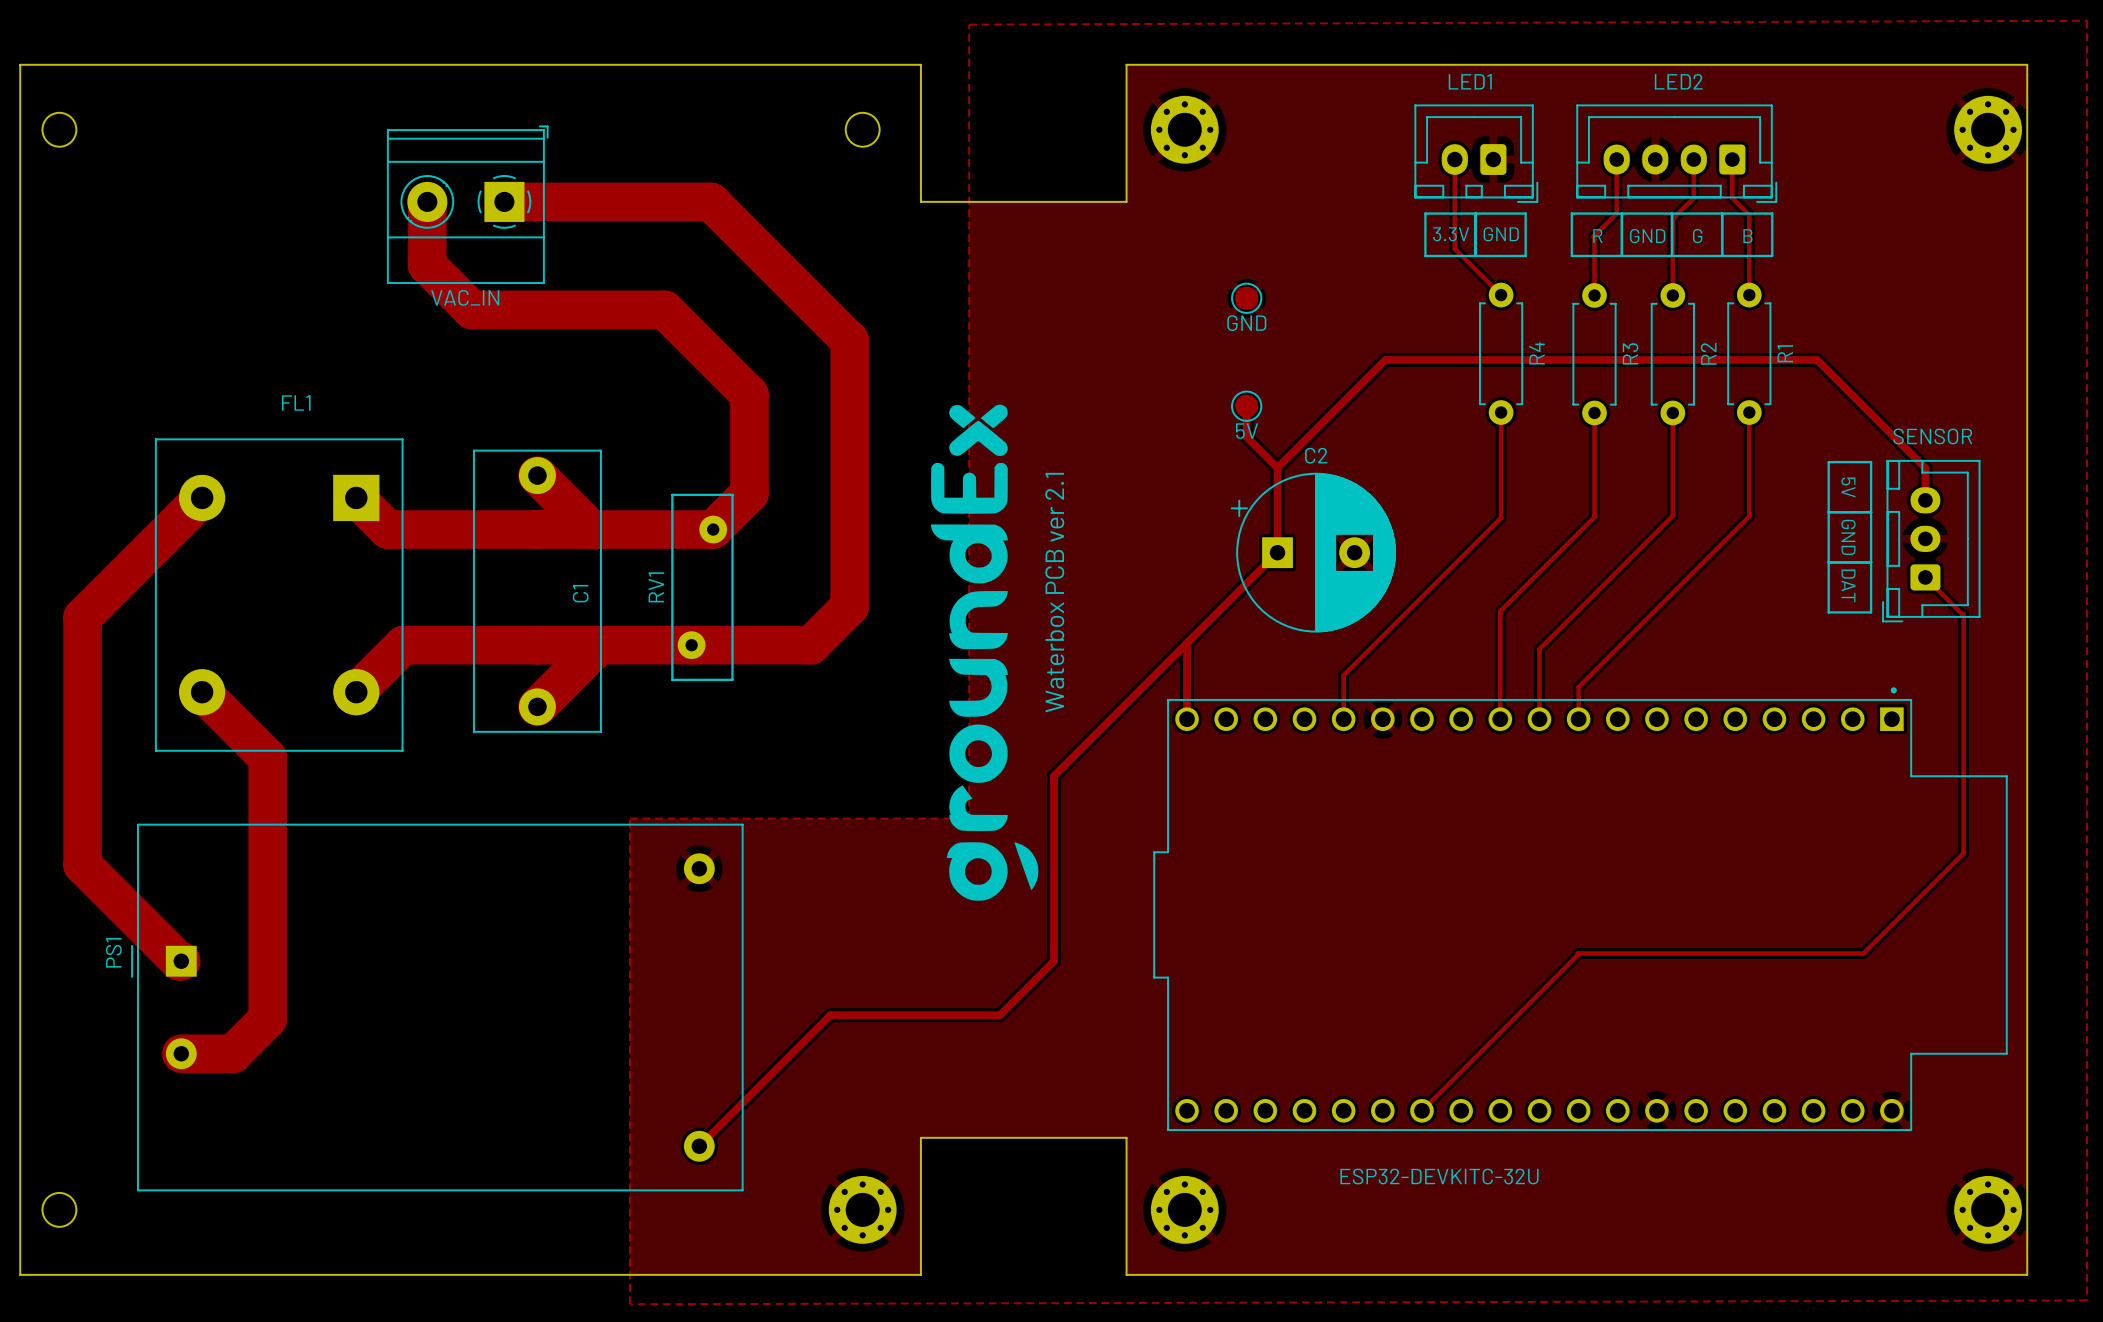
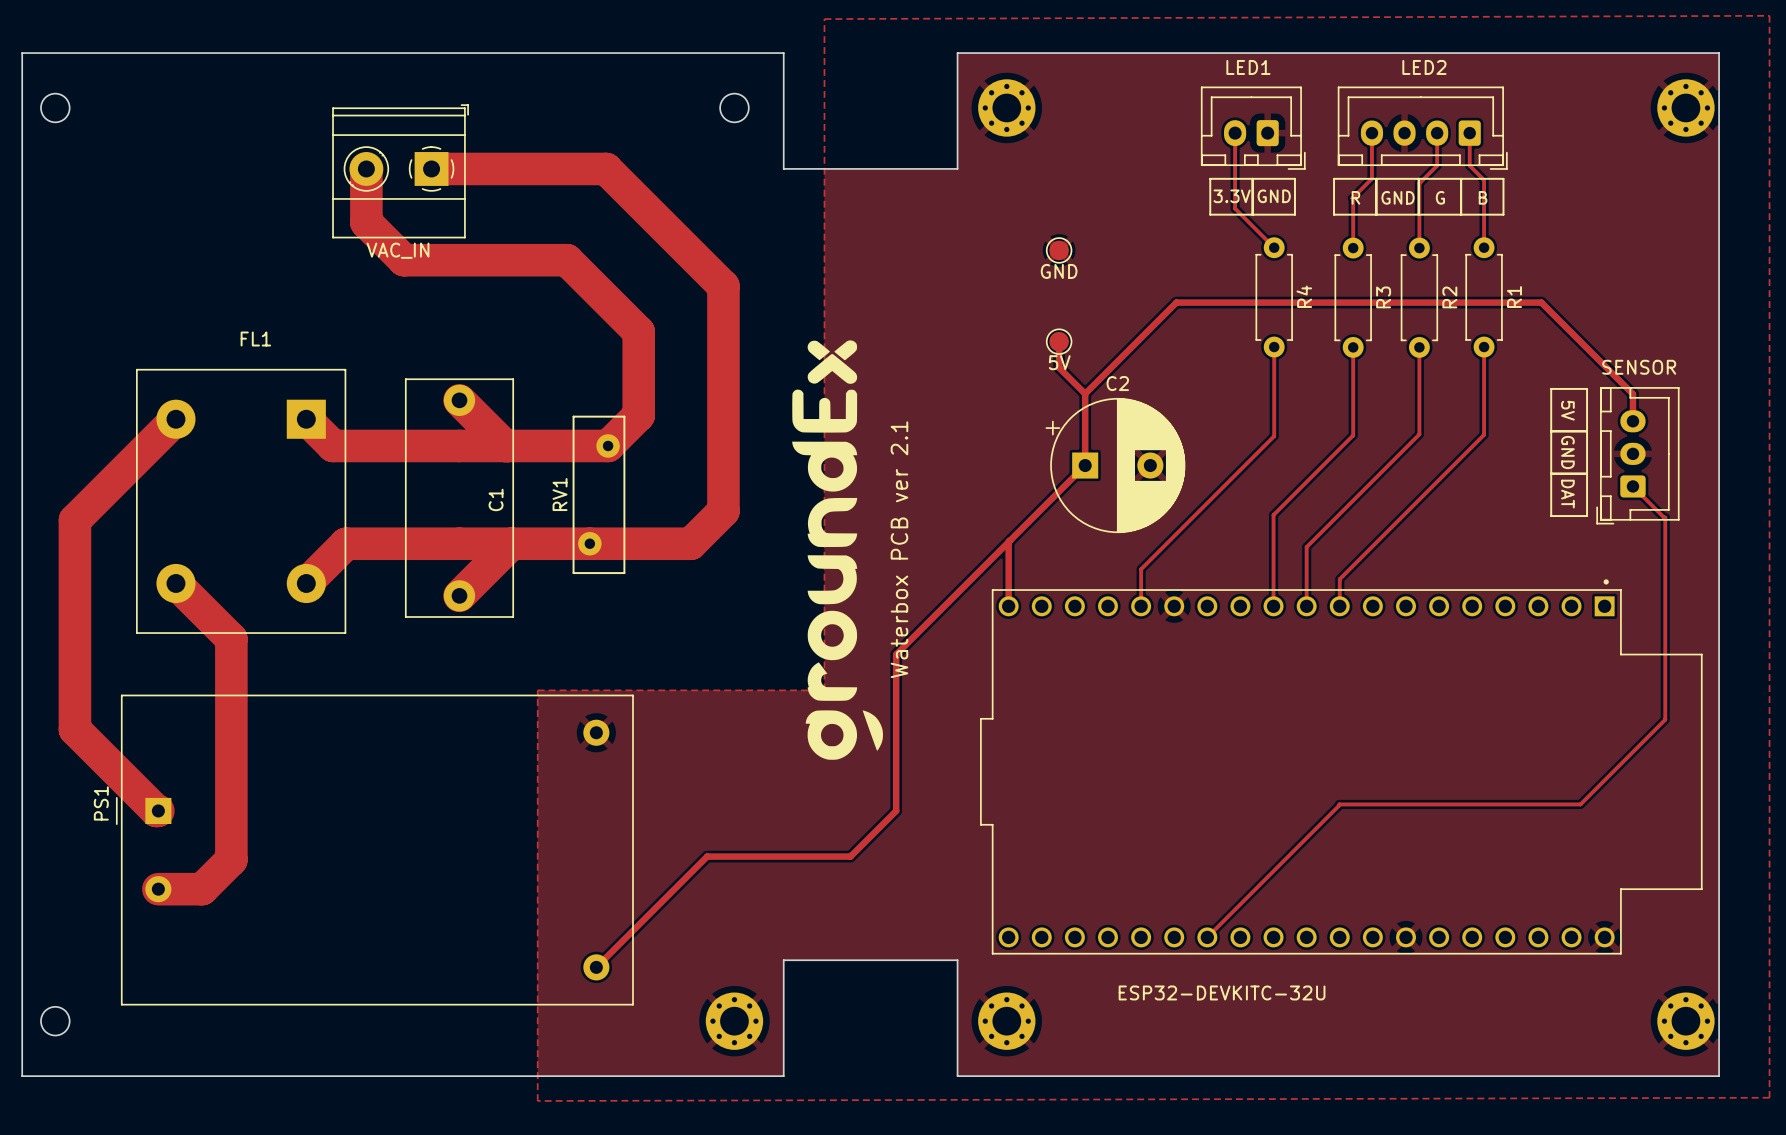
text position: Waterbox PCB ver 2.1 (1054, 592) -> Waterbox PCB ver 2.1 (899, 549)

